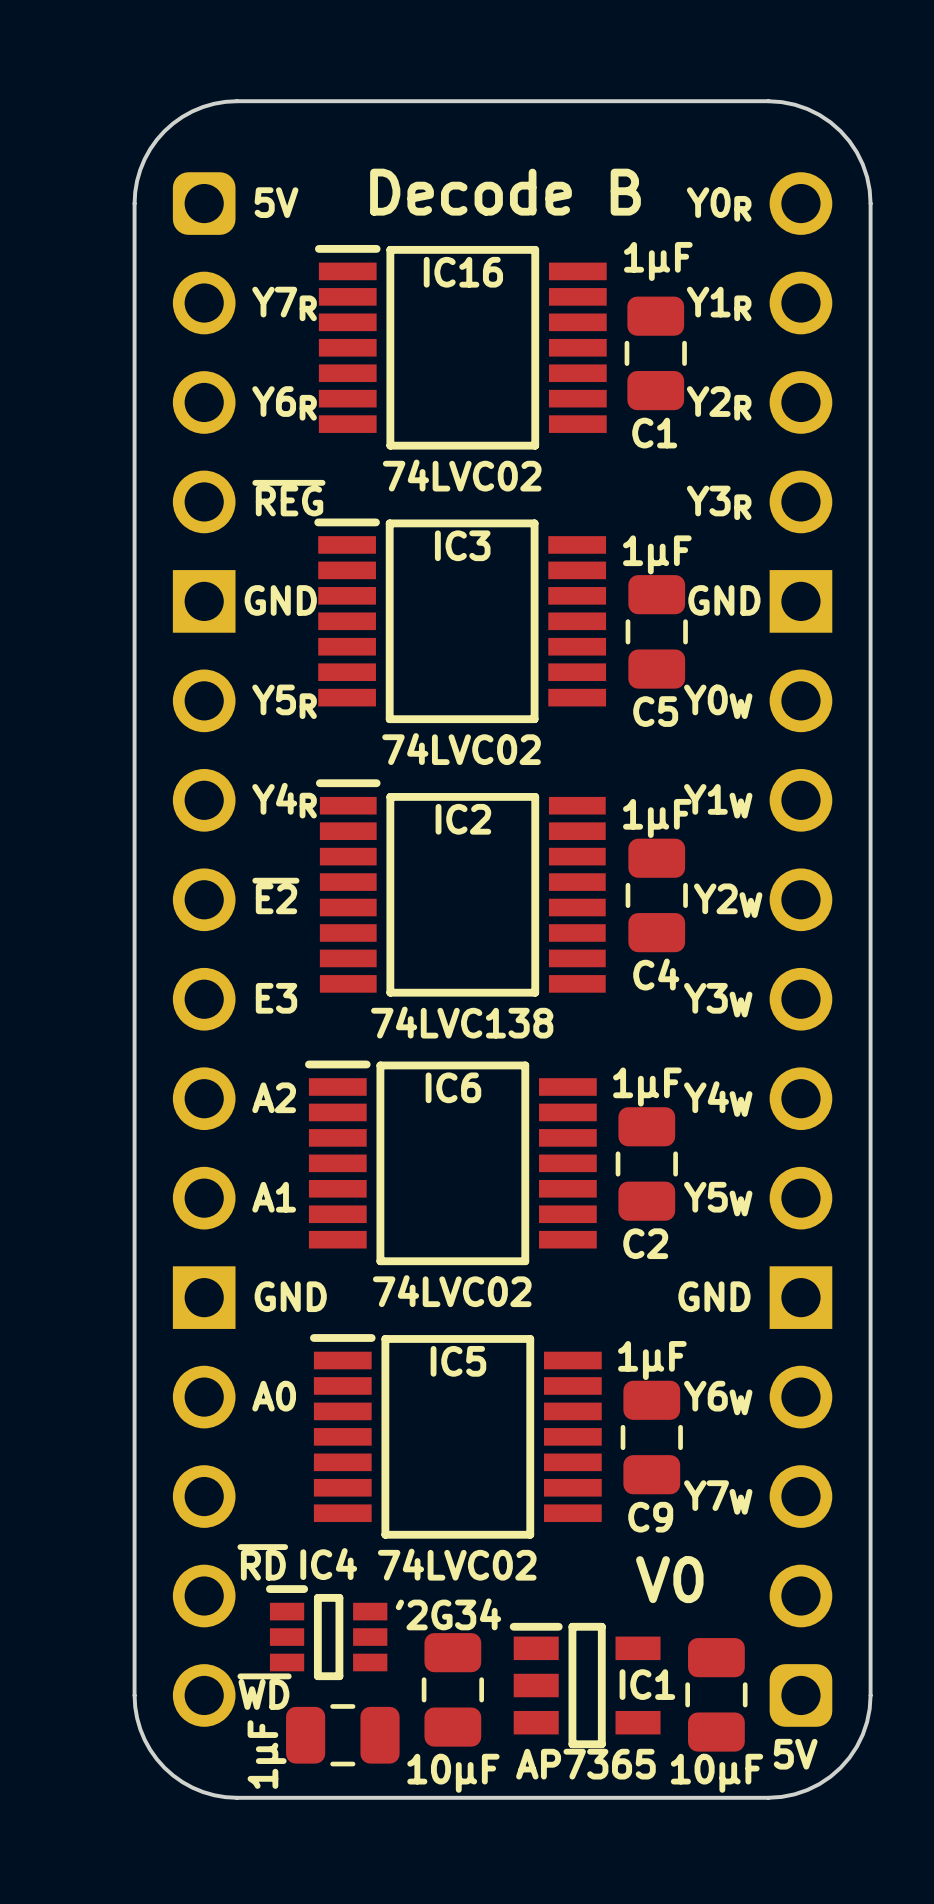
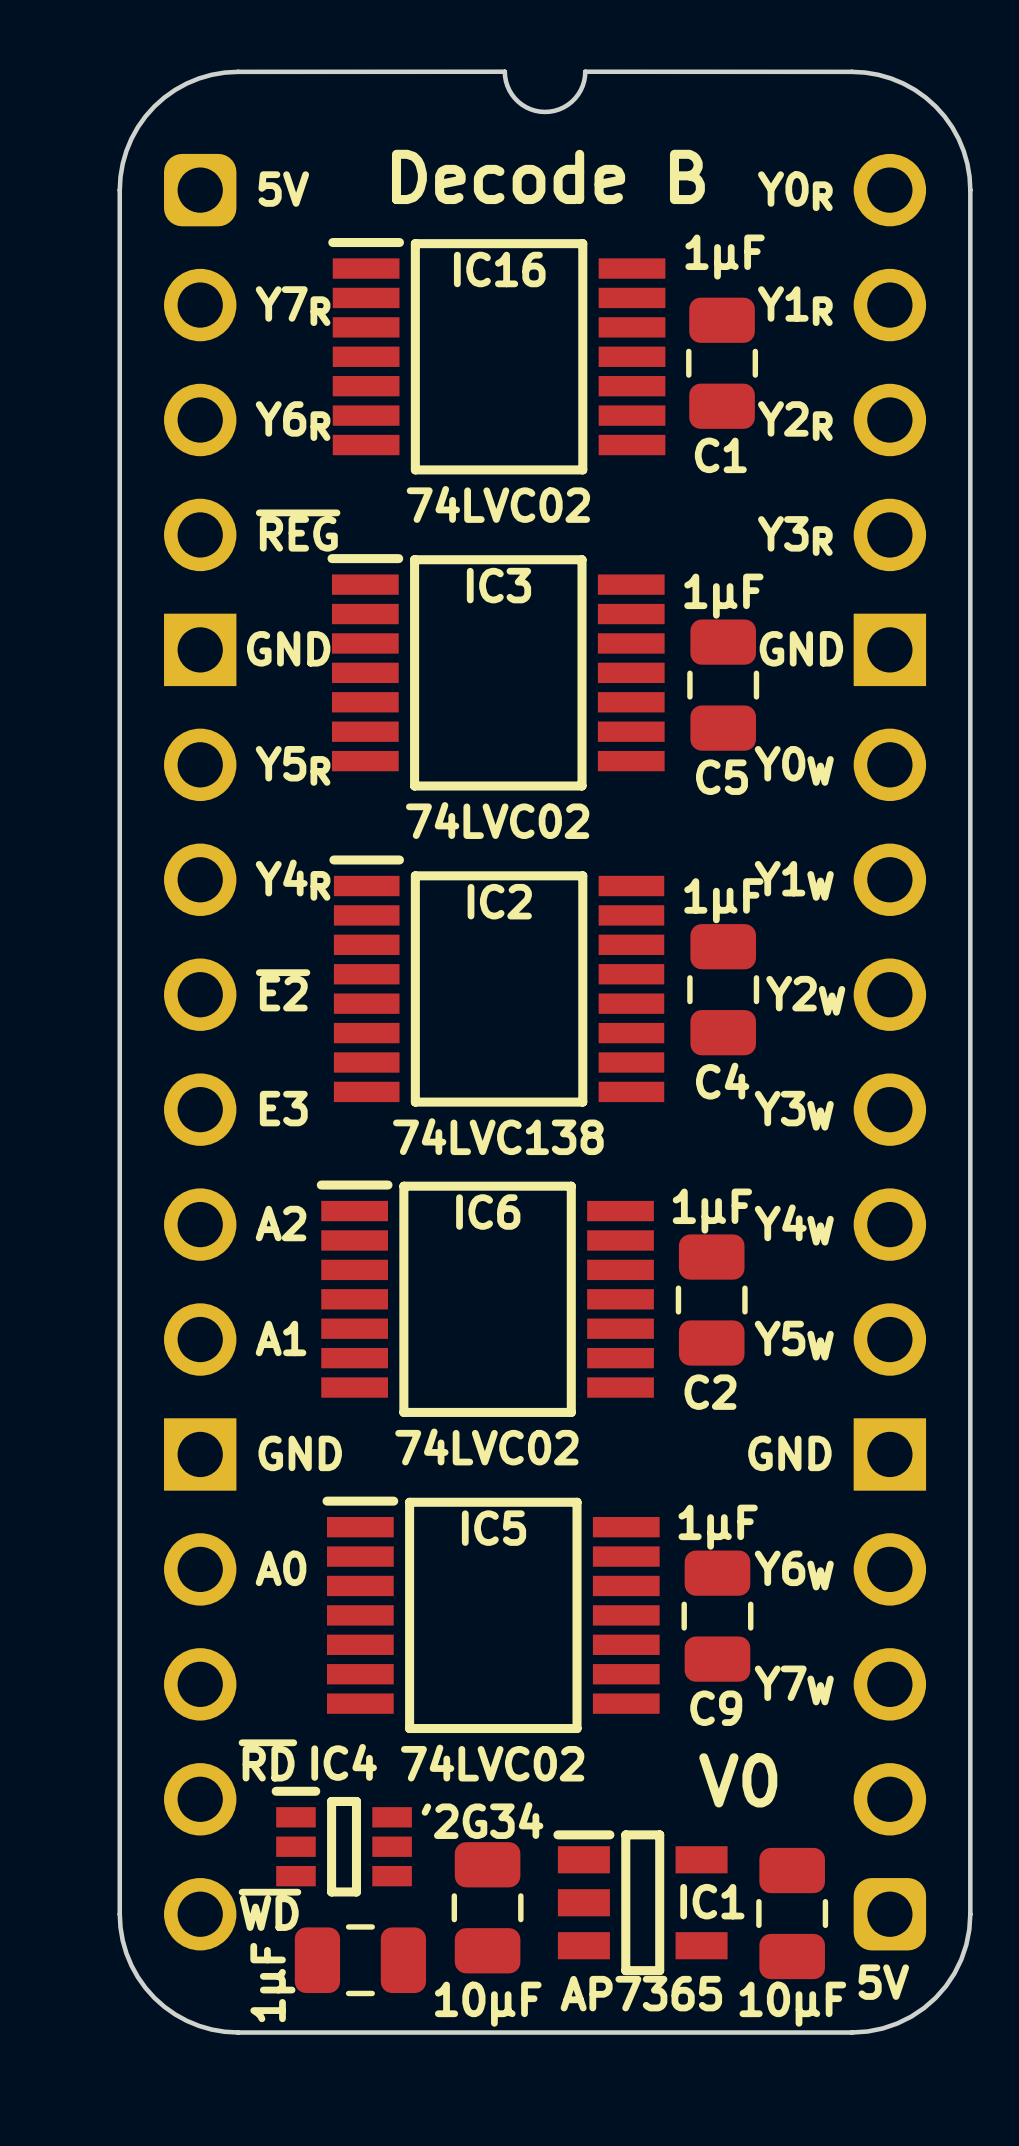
part footprint: [132, 99, 873, 1800] -> [117, 69, 973, 2035]

